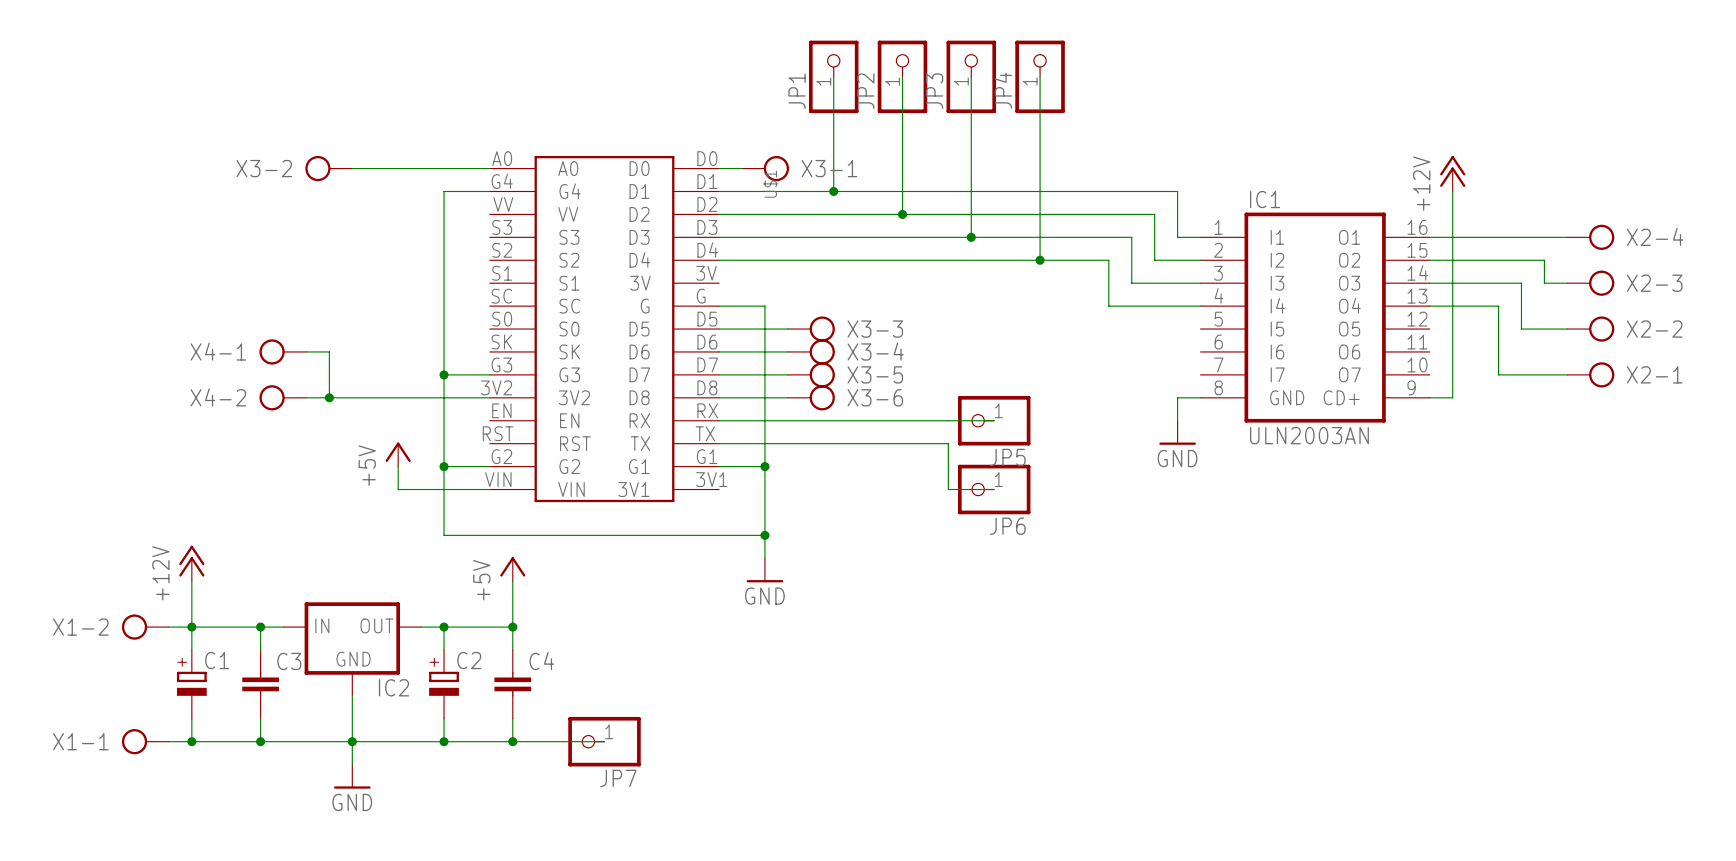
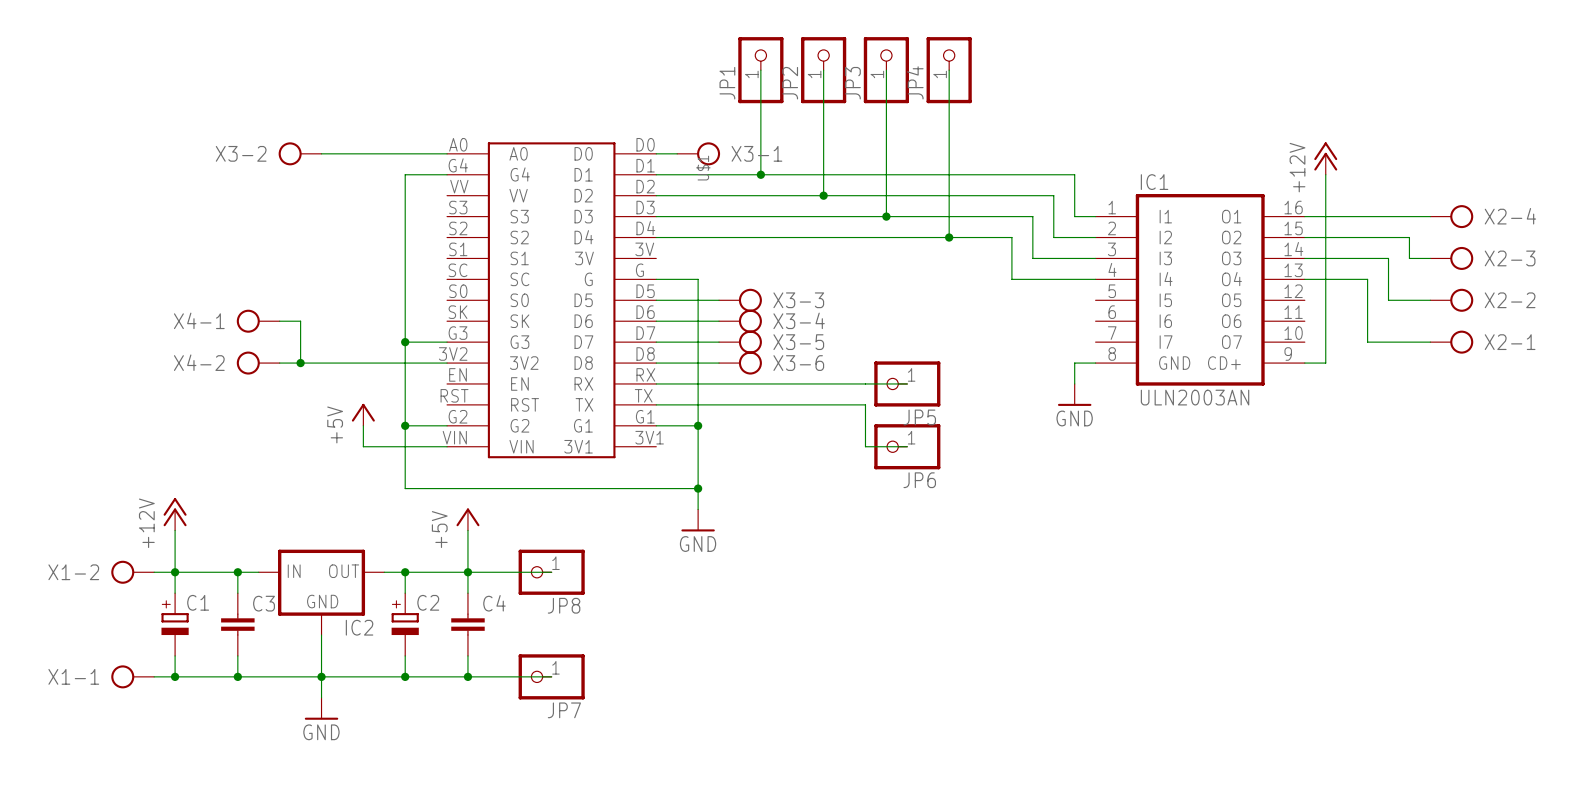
wire: none -> (467, 572) (551, 572)
JP8: none -> (551, 572)

